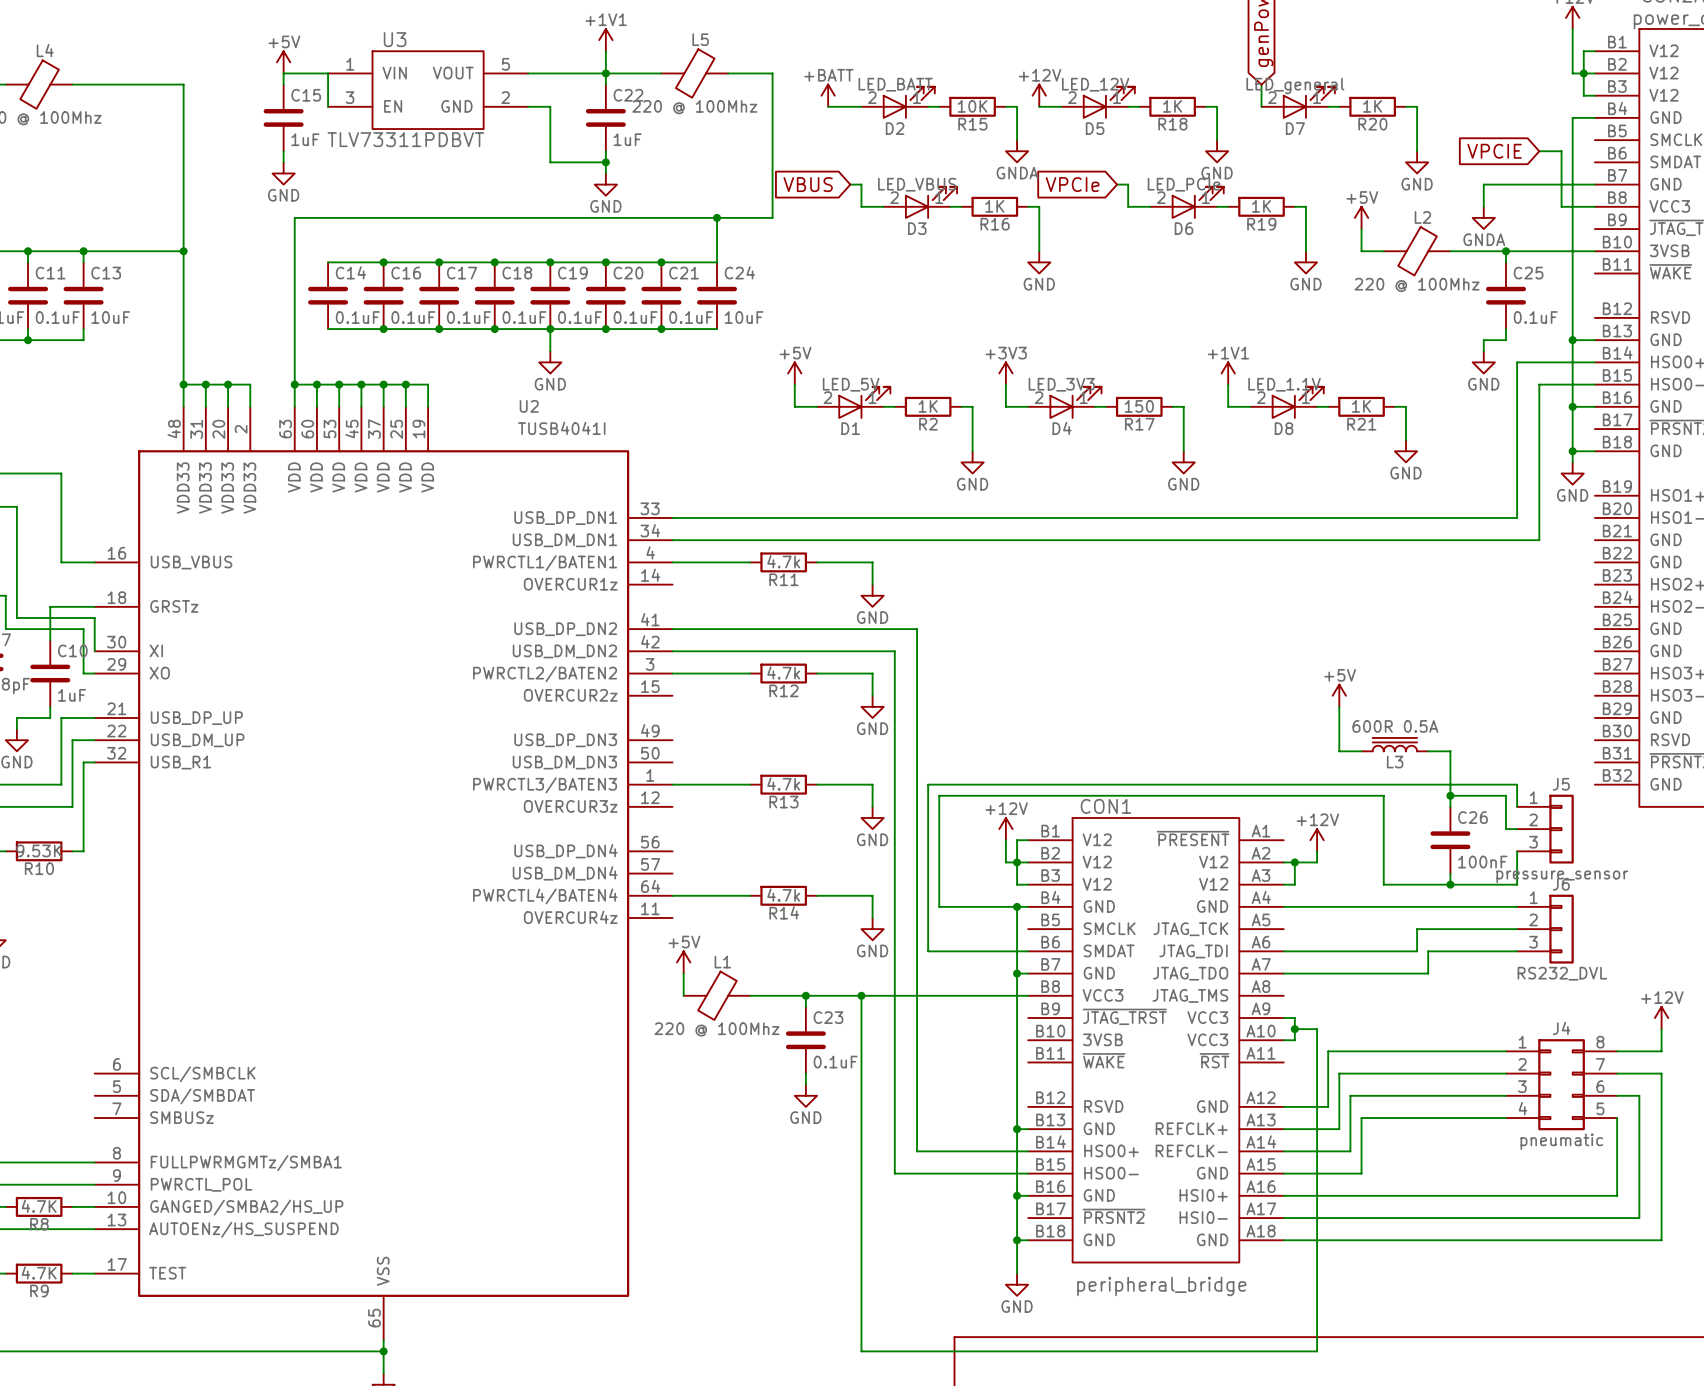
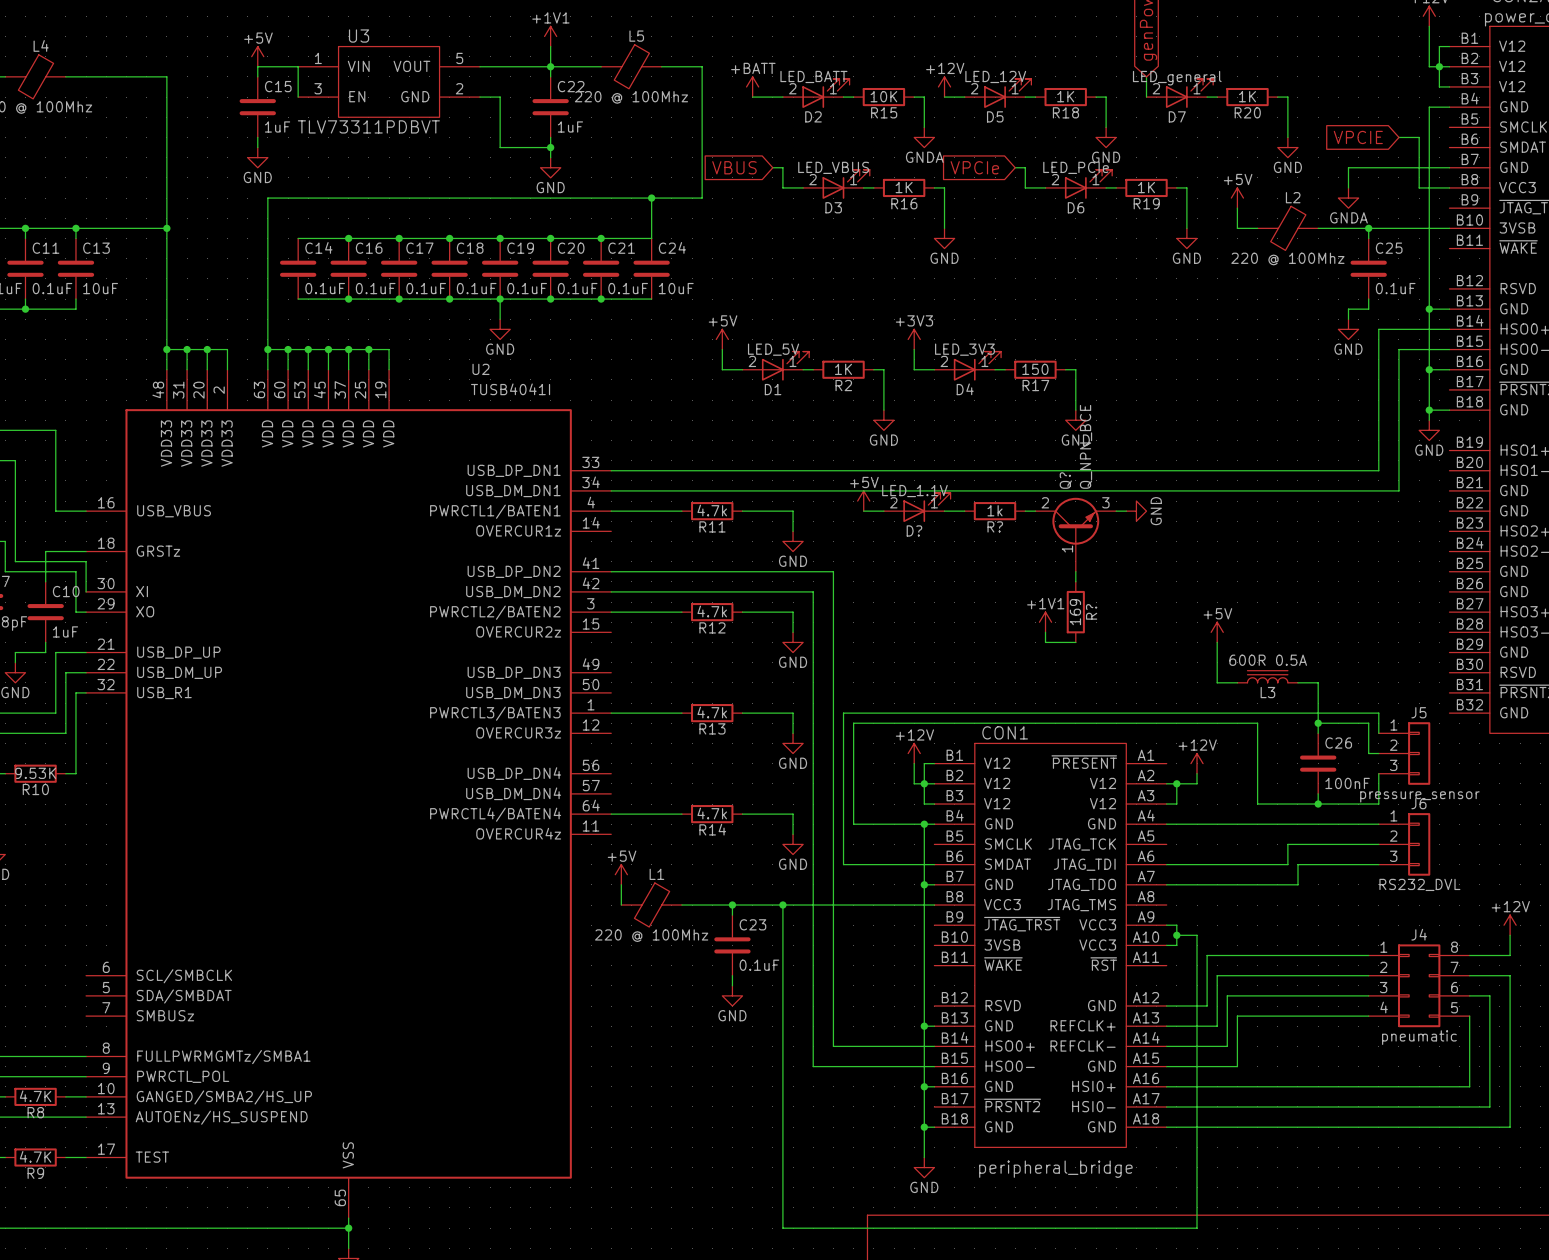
power symbol: +1V1 (1228, 373) -> none
wire: (1228, 384) (1228, 406) (1250, 406) -> none
D8: LED_1.1V (1287, 402) -> none
wire: (1317, 406) (1328, 406) -> (1116, 511) (1126, 511)
R21: 1K (1361, 406) -> none
wire: (1394, 406) (1405, 406) (1405, 440) -> none
power symbol rotation: 0° (1405, 451) -> 90° counterclockwise (1136, 511)
power symbol position: GND (1405, 451) -> GND (1136, 511)
power symbol: none -> +5V (863, 501)
D?: none -> LED_1.1V (917, 507)
wire: none -> (863, 511) (883, 511)
wire: none -> (944, 511) (964, 511)
R?: none -> 1k (995, 511)
wire: none -> (1025, 511) (1035, 511)
Q?: none -> Q_NPN_BCE (1075, 534)
wire: none -> (1075, 571) (1075, 581)
R?: none -> 169 (1075, 612)
power symbol: none -> +1V1 (1045, 622)
wire: none -> (1045, 632) (1045, 642) (1075, 642)

